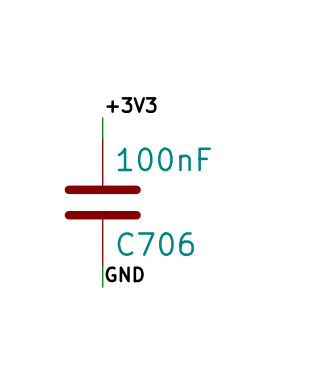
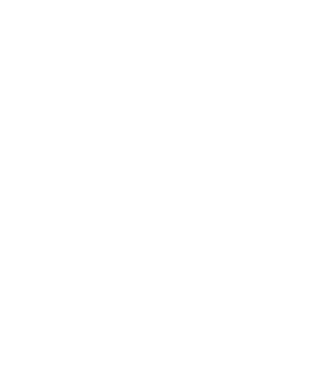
label: +3V3 (131, 105) -> none
wire: (102, 117) (102, 139) -> none
C706: 100nF (102, 202) -> none
wire: (102, 266) (102, 287) -> none
label: GND (124, 274) -> none

